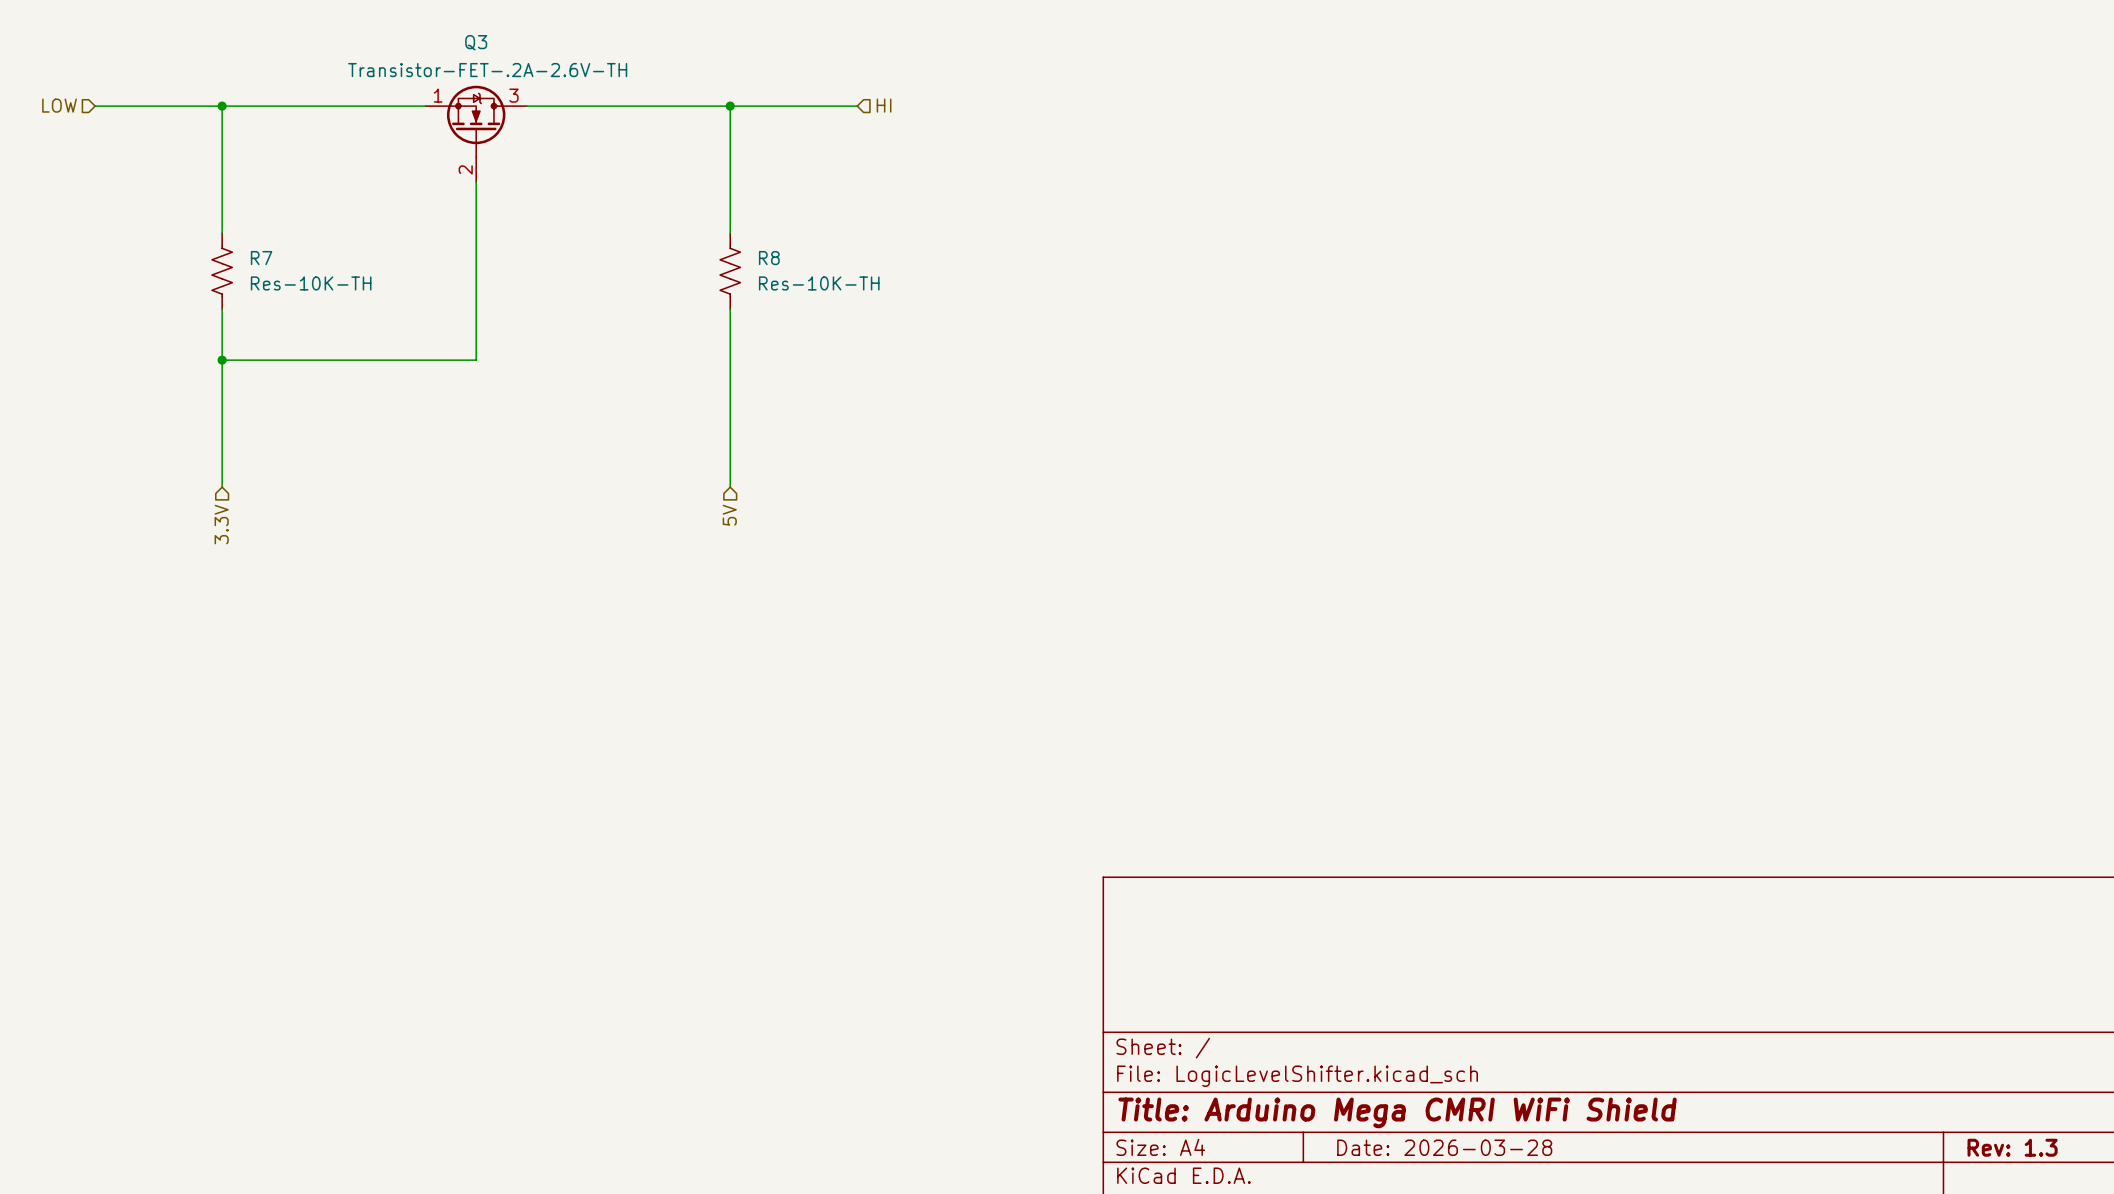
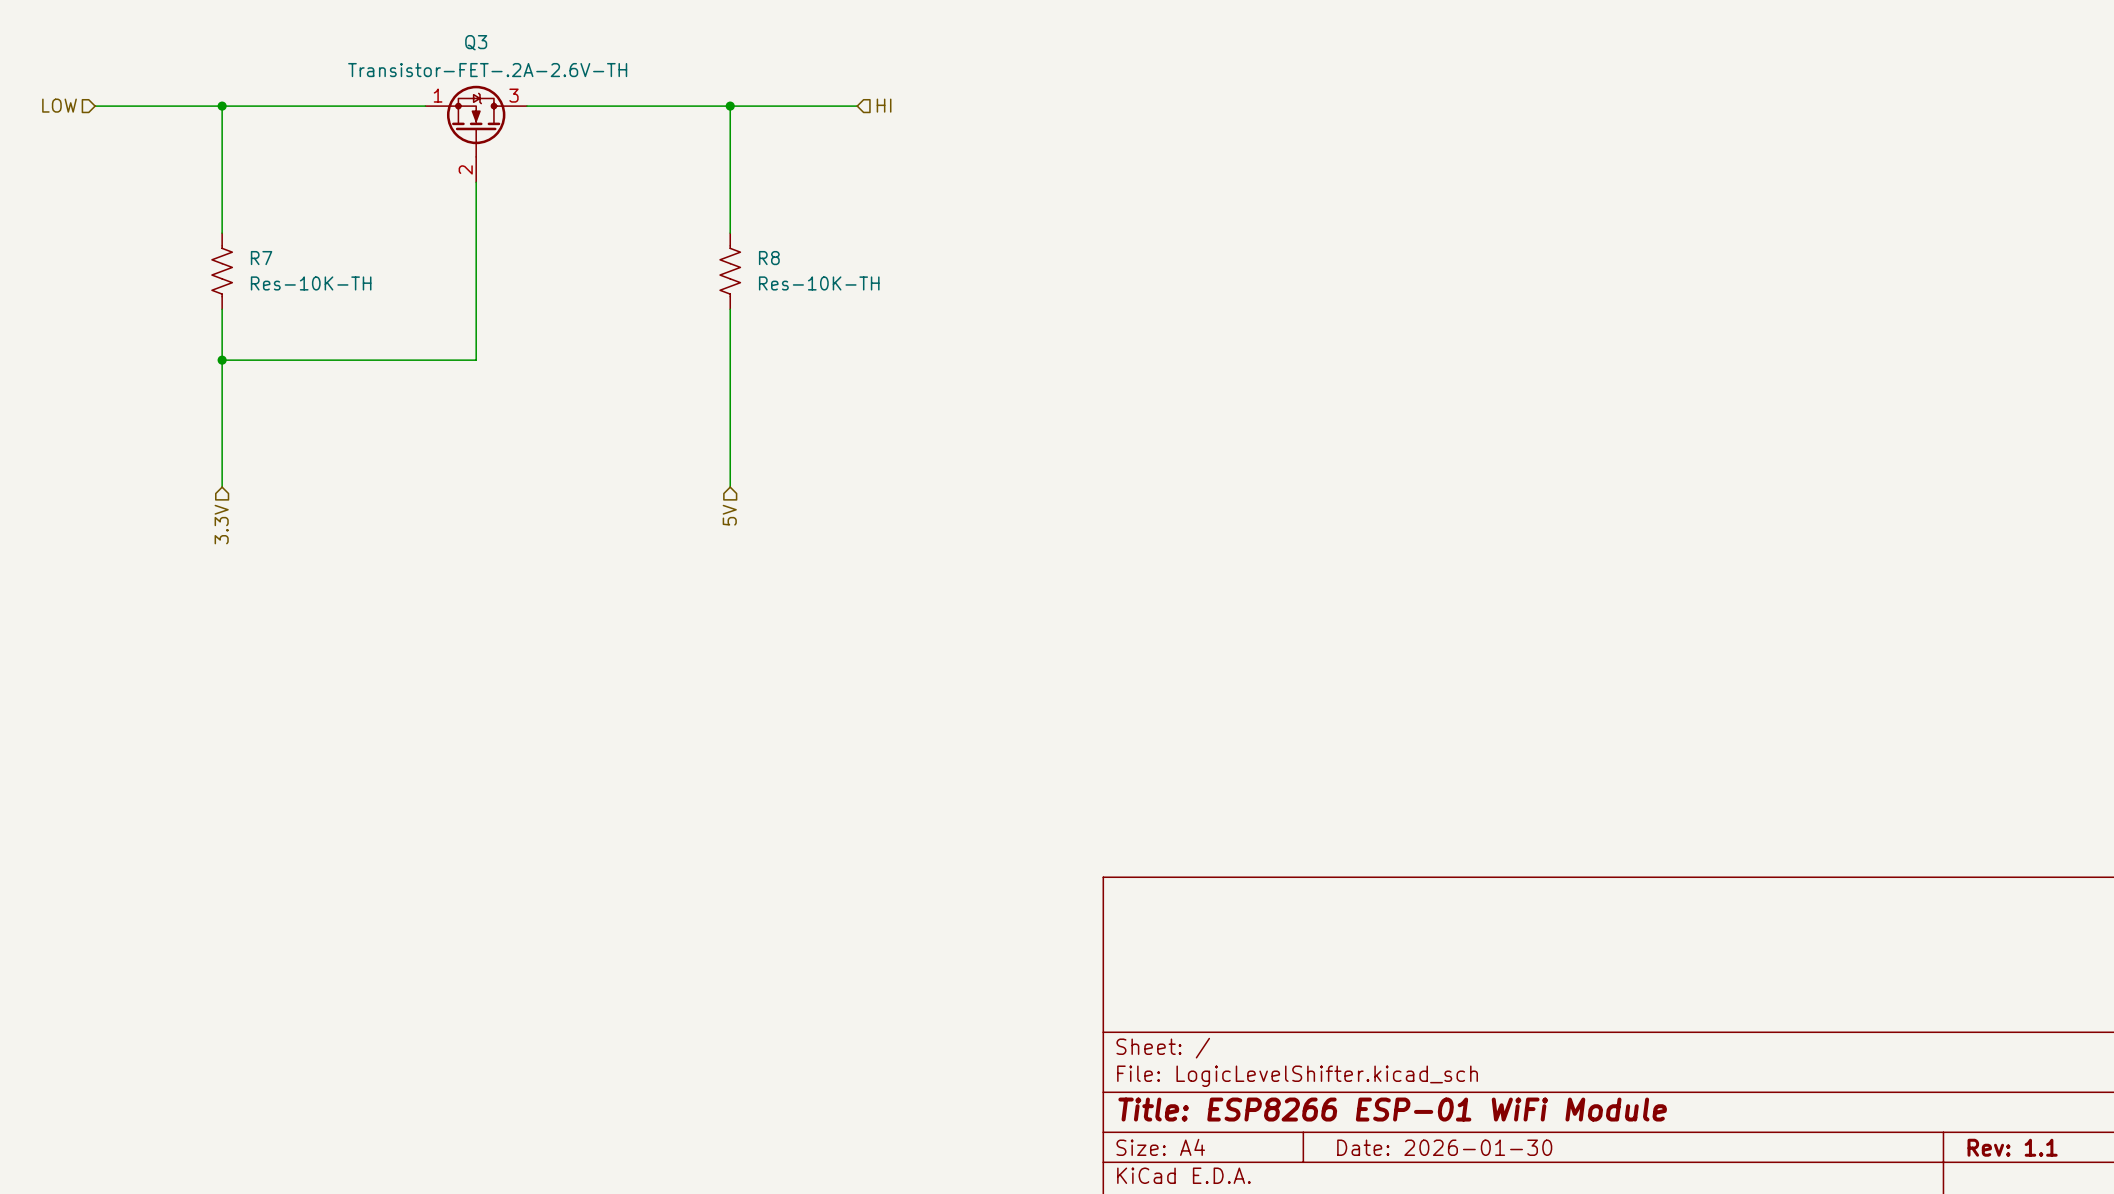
title block: Title: Arduino Mega CMRI WiFi Shield (1397, 1112) -> Title: ESP8266 ESP-01 WiFi Module (1392, 1109)
title block: Date: 2026-03-28 (1444, 1147) -> Date: 2026-01-30 (1444, 1147)
title block: Rev: 1.3 (2012, 1147) -> Rev: 1.1 (2012, 1147)

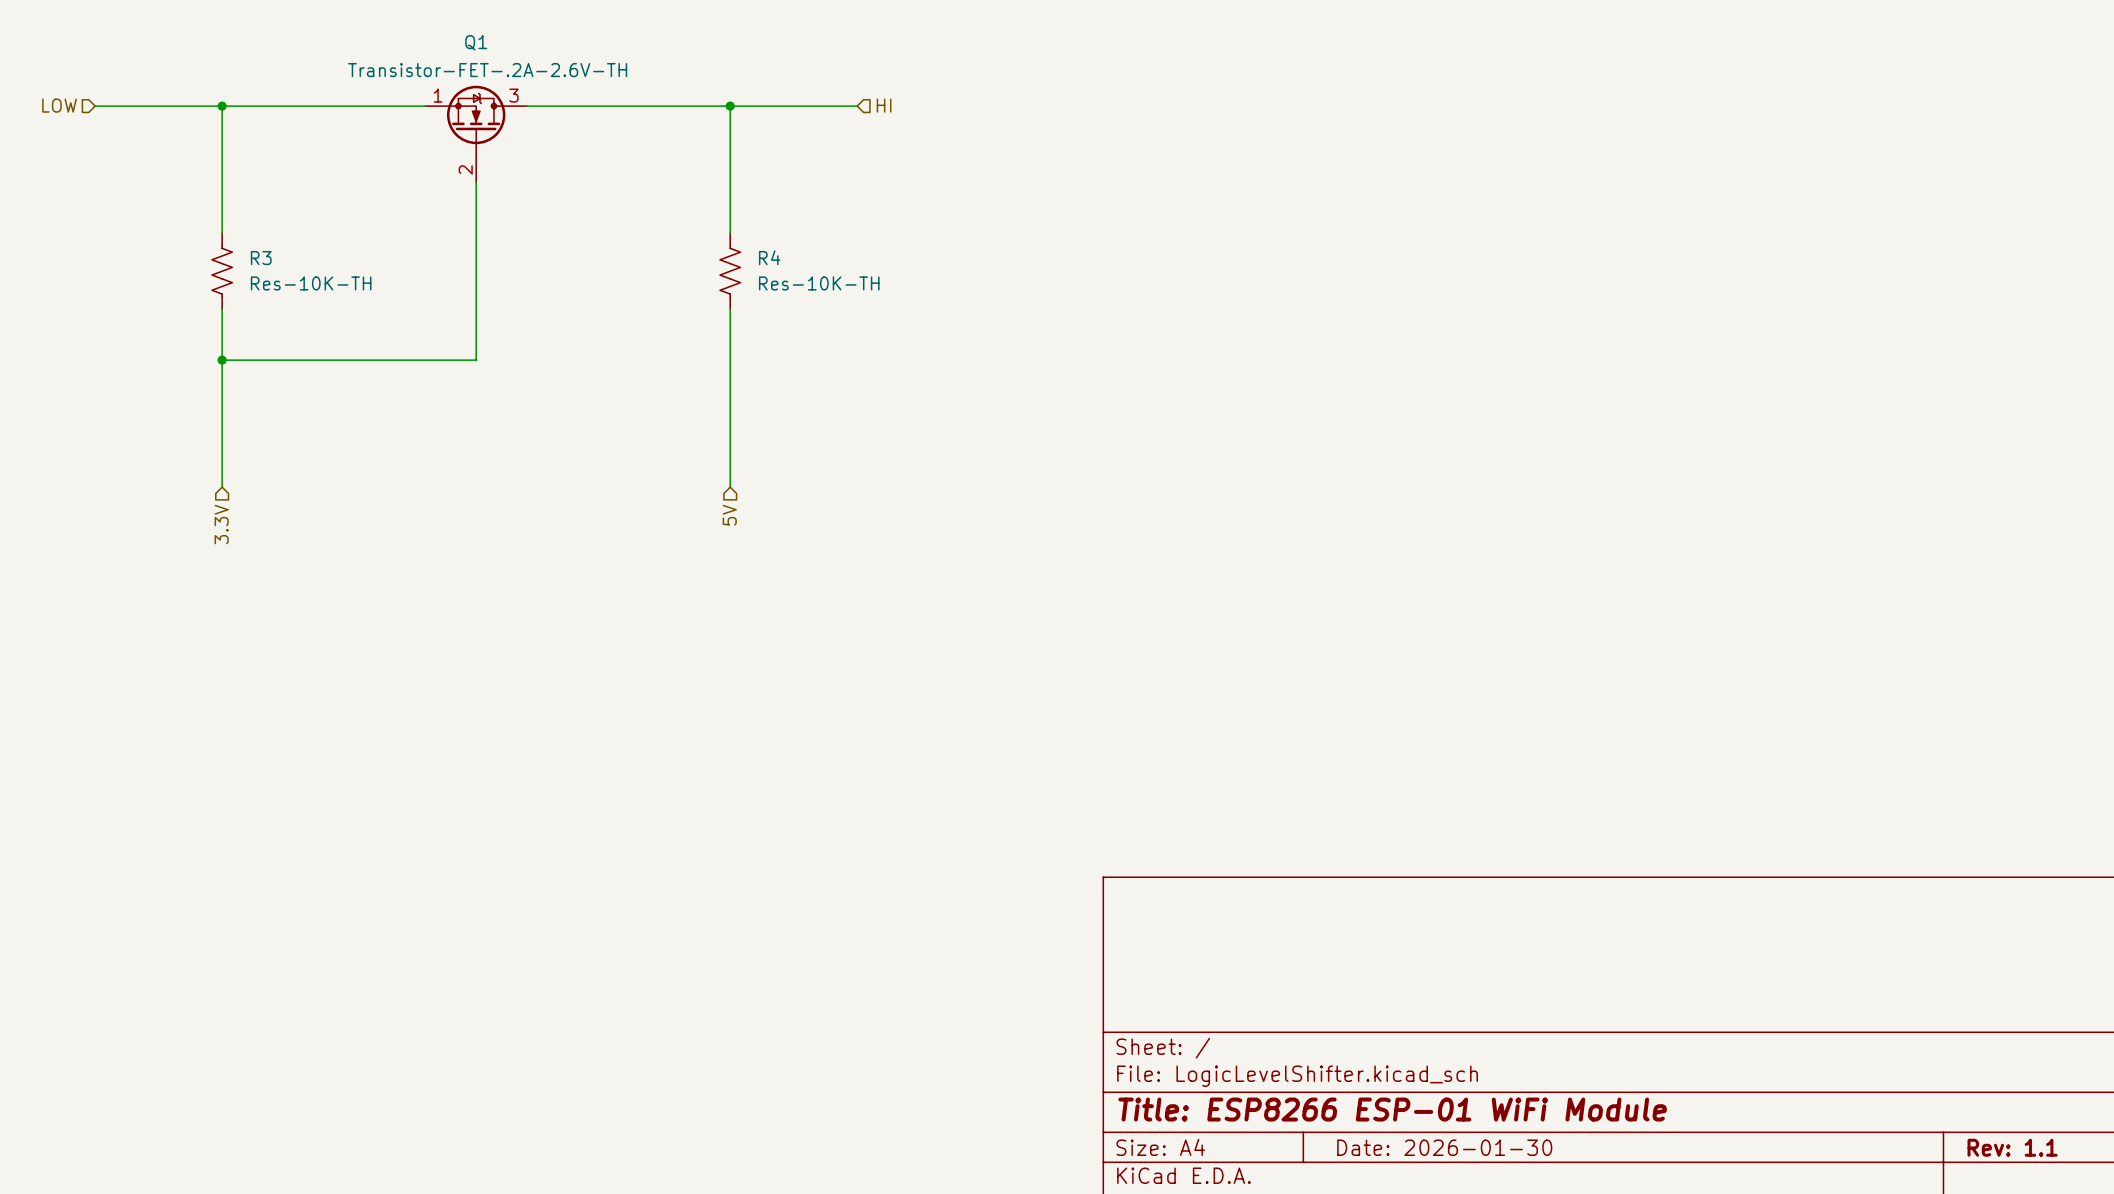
Q3 name: Q3 (476, 42) -> Q1 (476, 42)
R7 name: R7 (261, 258) -> R3 (261, 258)
R8 name: R8 (769, 258) -> R4 (769, 257)

